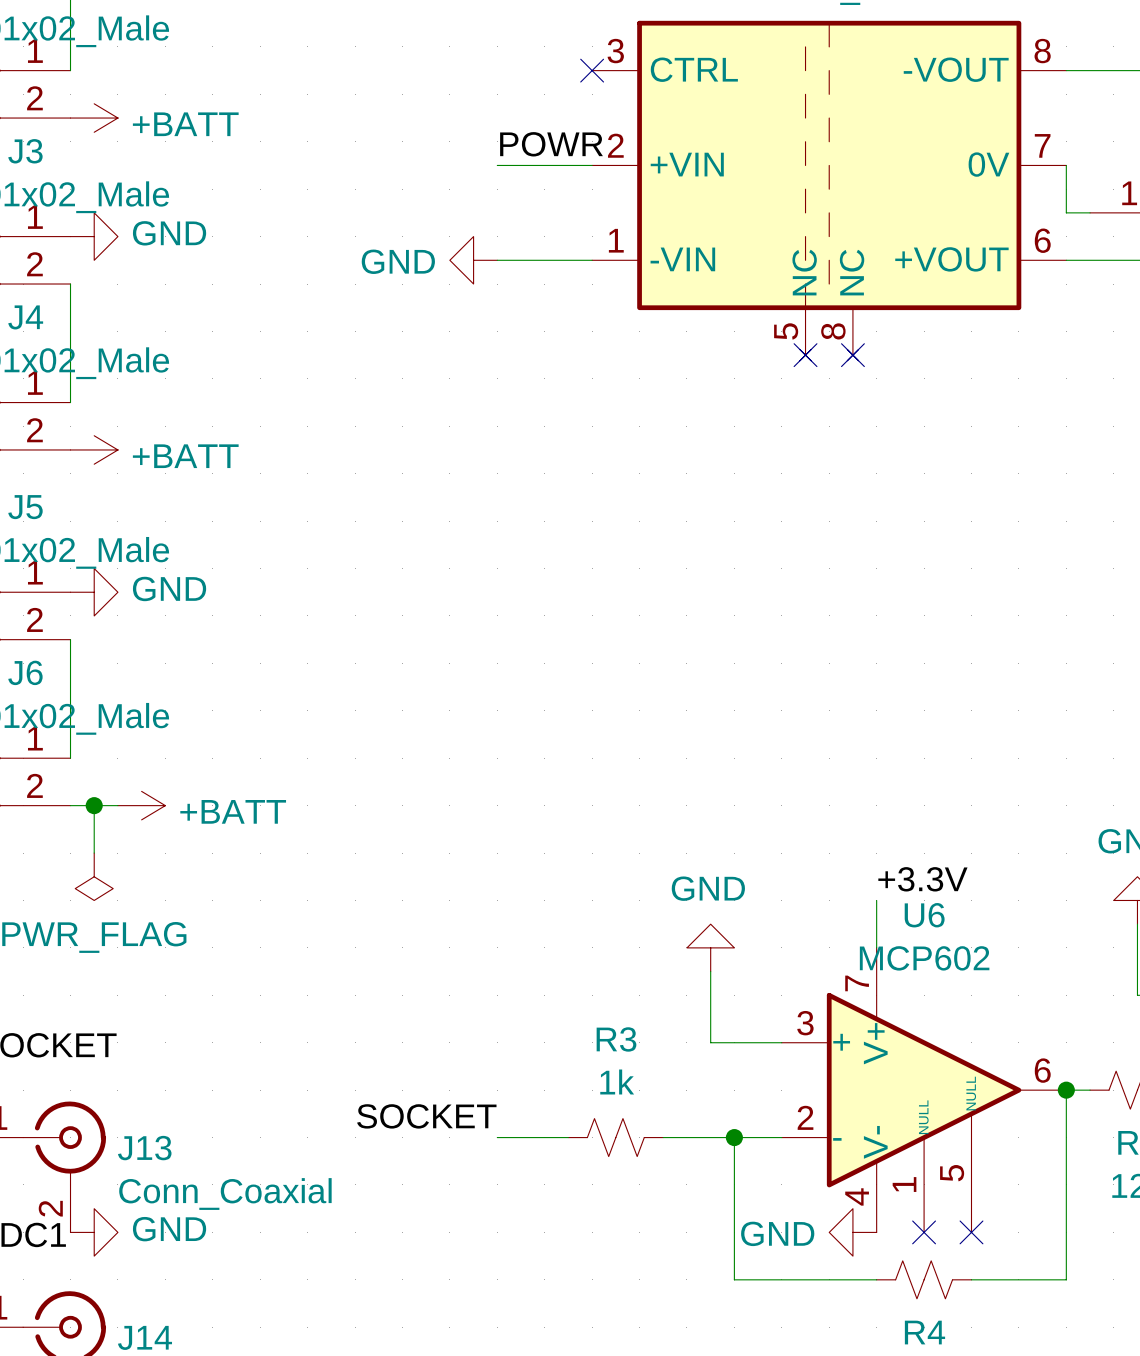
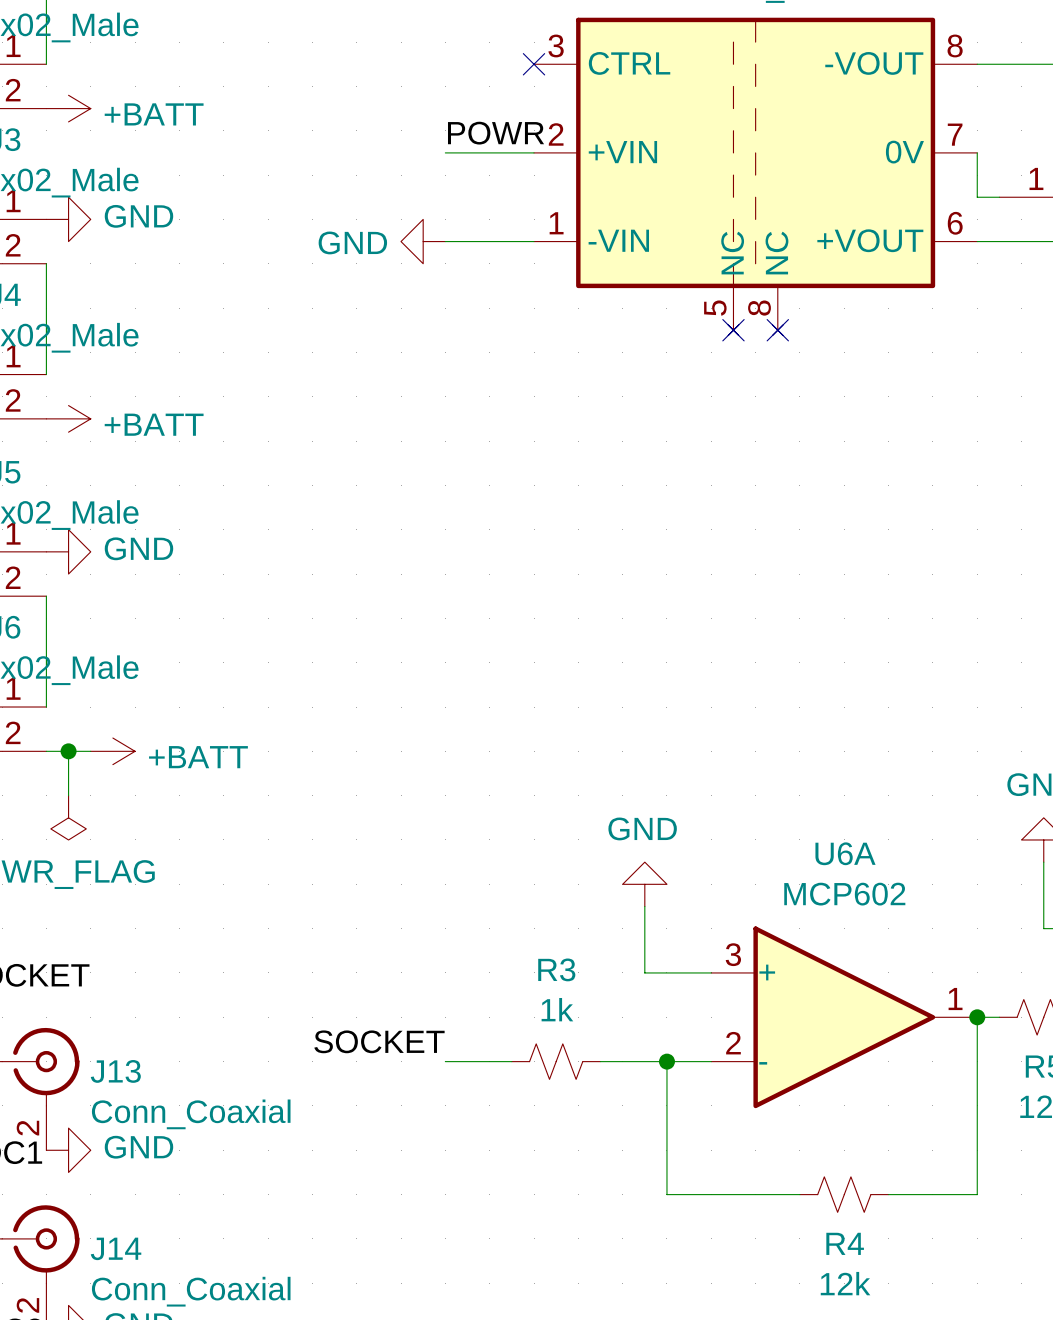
label: +3.3V (922, 879) -> none
wire: (876, 900) (876, 947) -> none
U6: MCP602 (924, 1090) -> none
U6A: none -> MCP602 (844, 1017)
power symbol: GND (852, 1232) -> none
no-connect mark: (924, 1232) -> none
no-connect mark: (971, 1232) -> none

